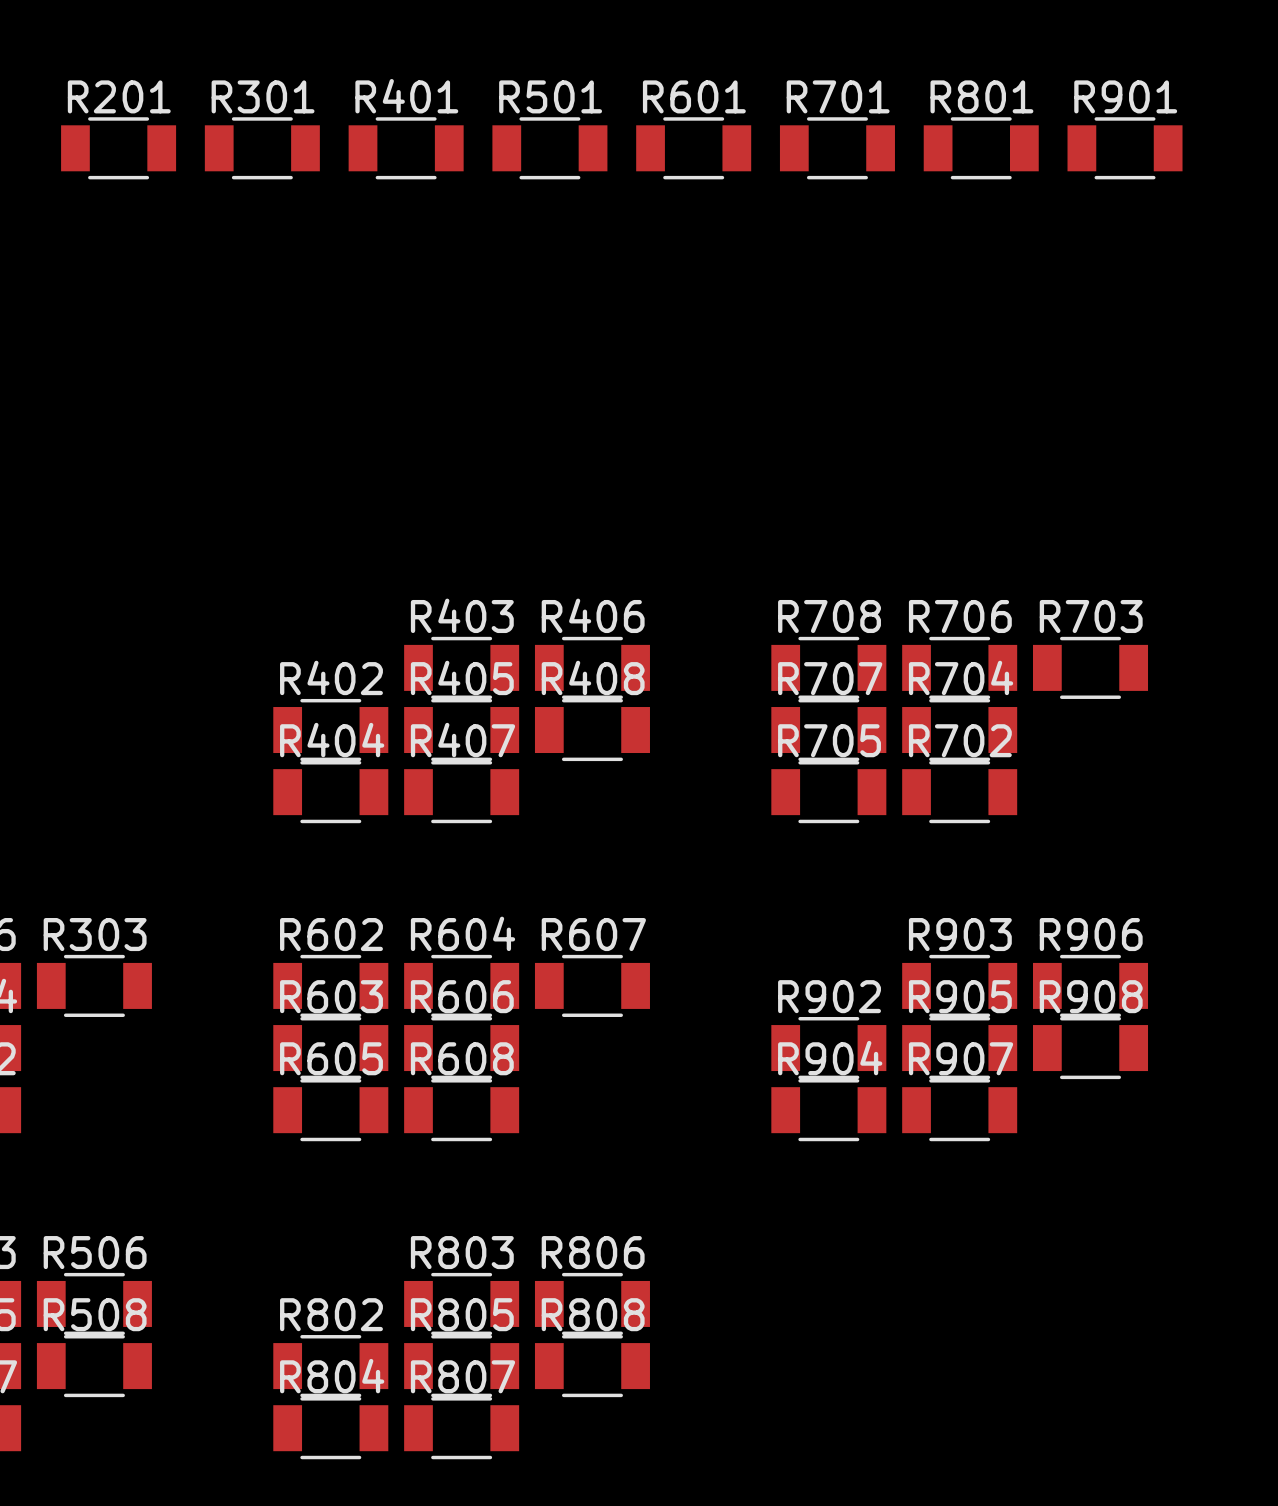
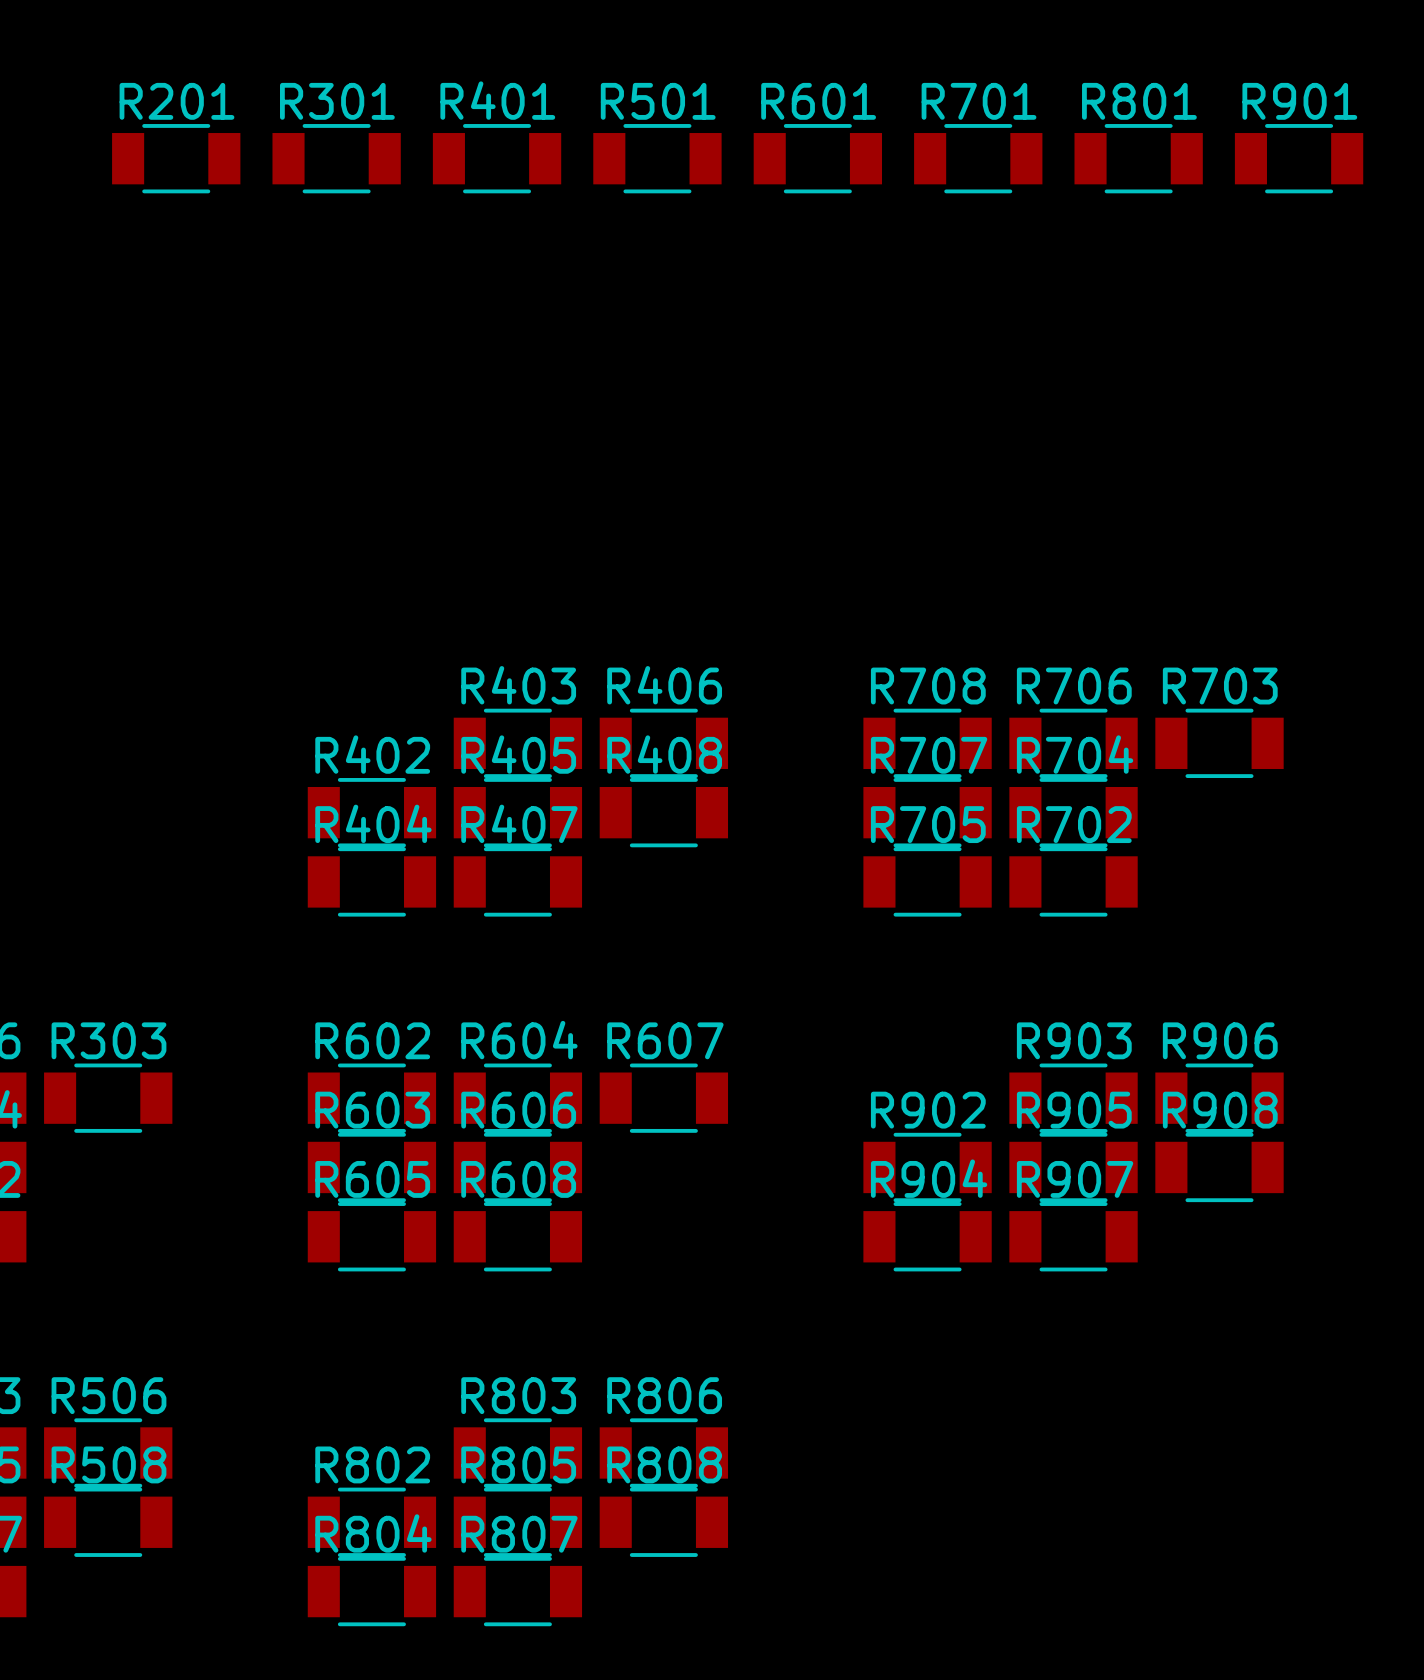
R201 position: (118, 148) -> (176, 158)
R301 position: (262, 148) -> (336, 158)
R401 position: (406, 148) -> (497, 158)
R501 position: (549, 148) -> (657, 158)
R601 position: (693, 148) -> (817, 158)
R701 position: (837, 148) -> (978, 158)
R801 position: (981, 148) -> (1138, 158)
R901 position: (1125, 148) -> (1299, 158)

